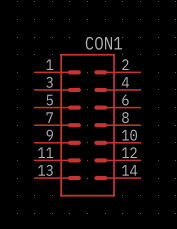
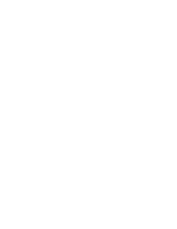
CON1: (87, 125) -> none

